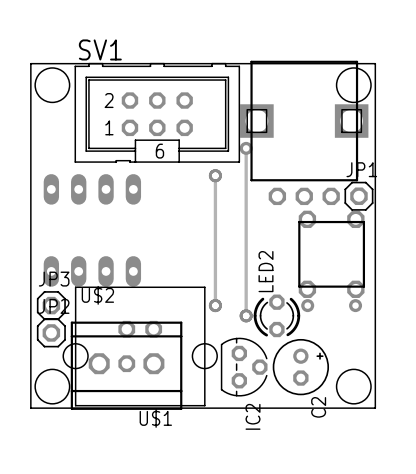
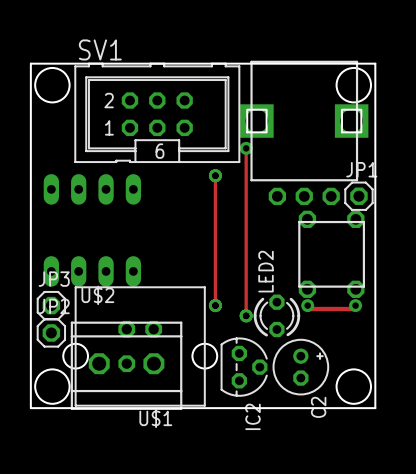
track: none -> (307, 309) (355, 309)

